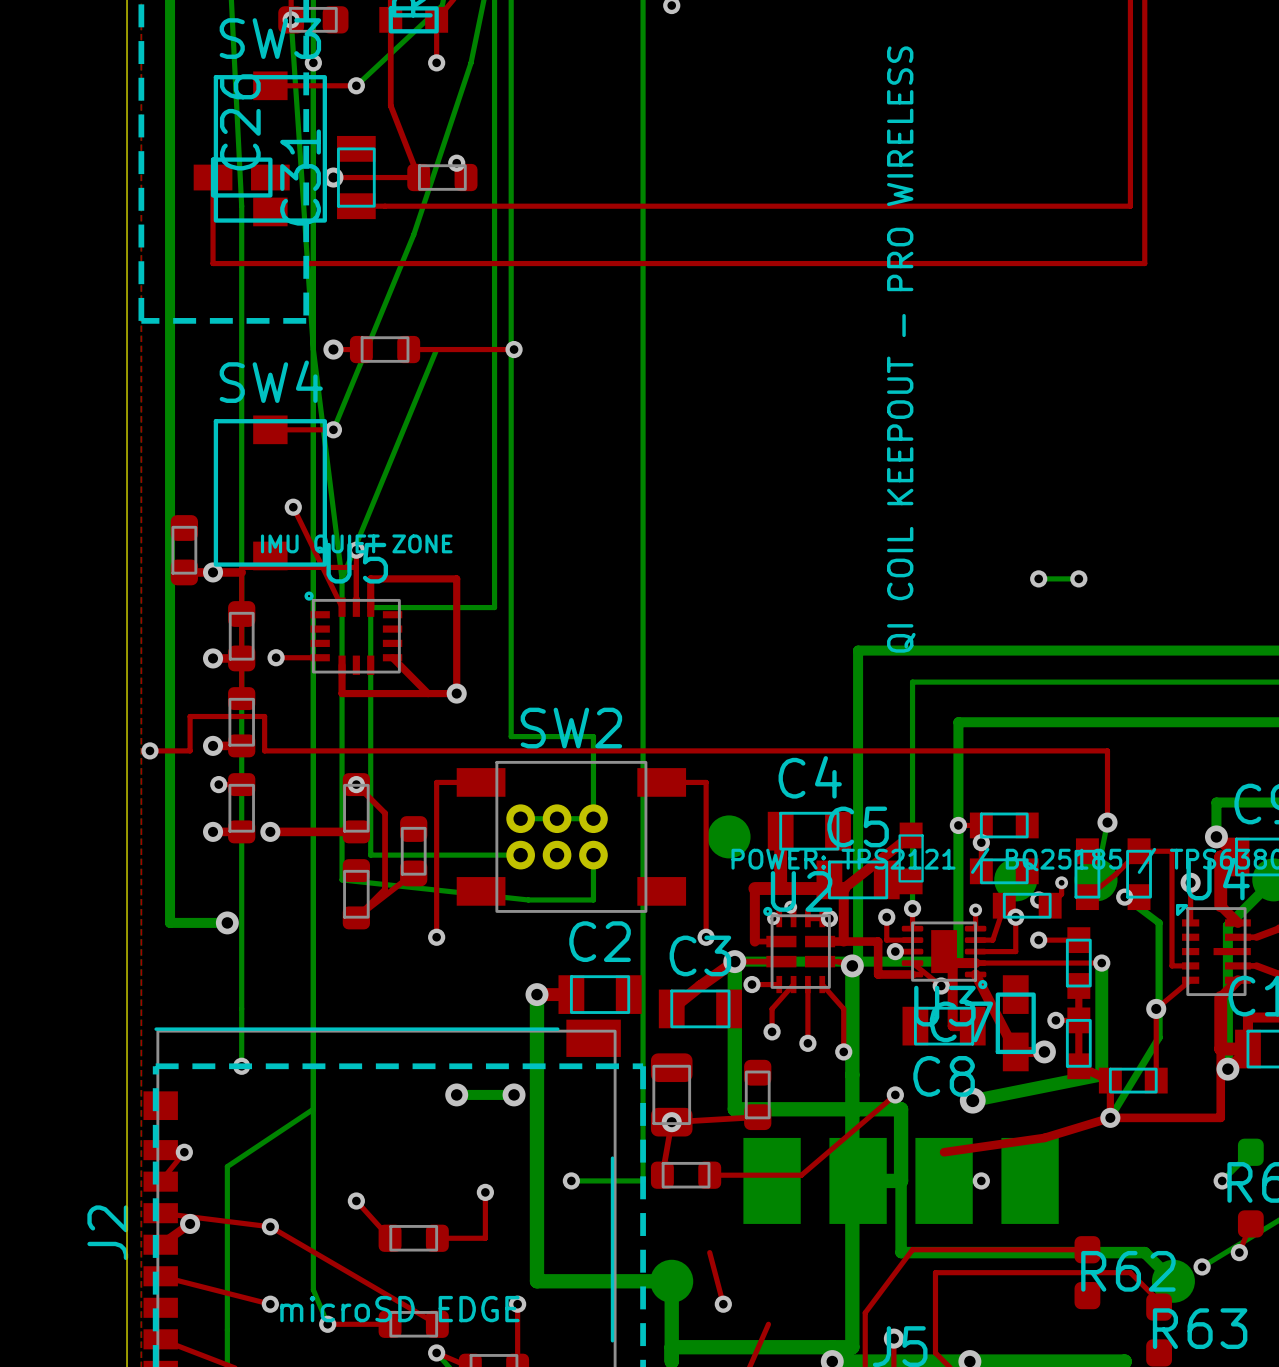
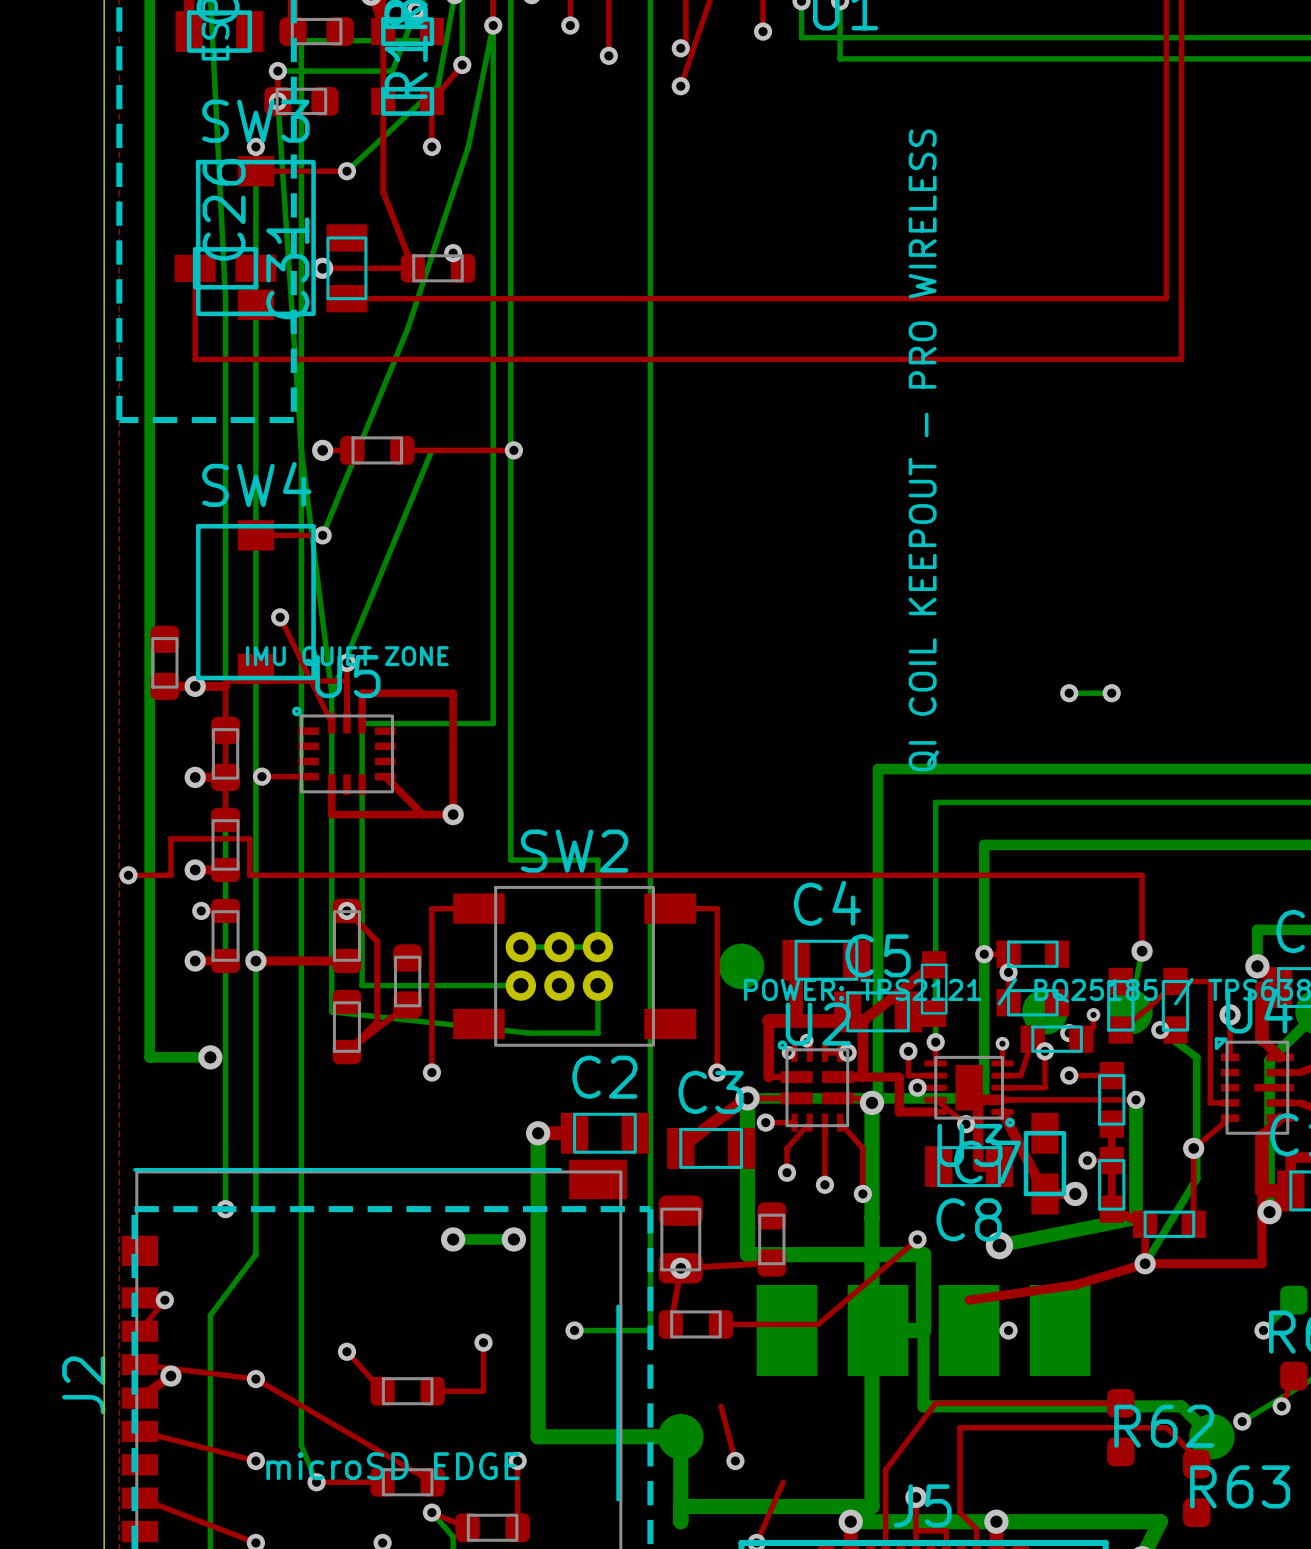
via position: (313, 62) -> (255, 146)
bottom track: (313, 1109) (227, 1166) -> (255, 146) (255, 1254) (210, 1315)

